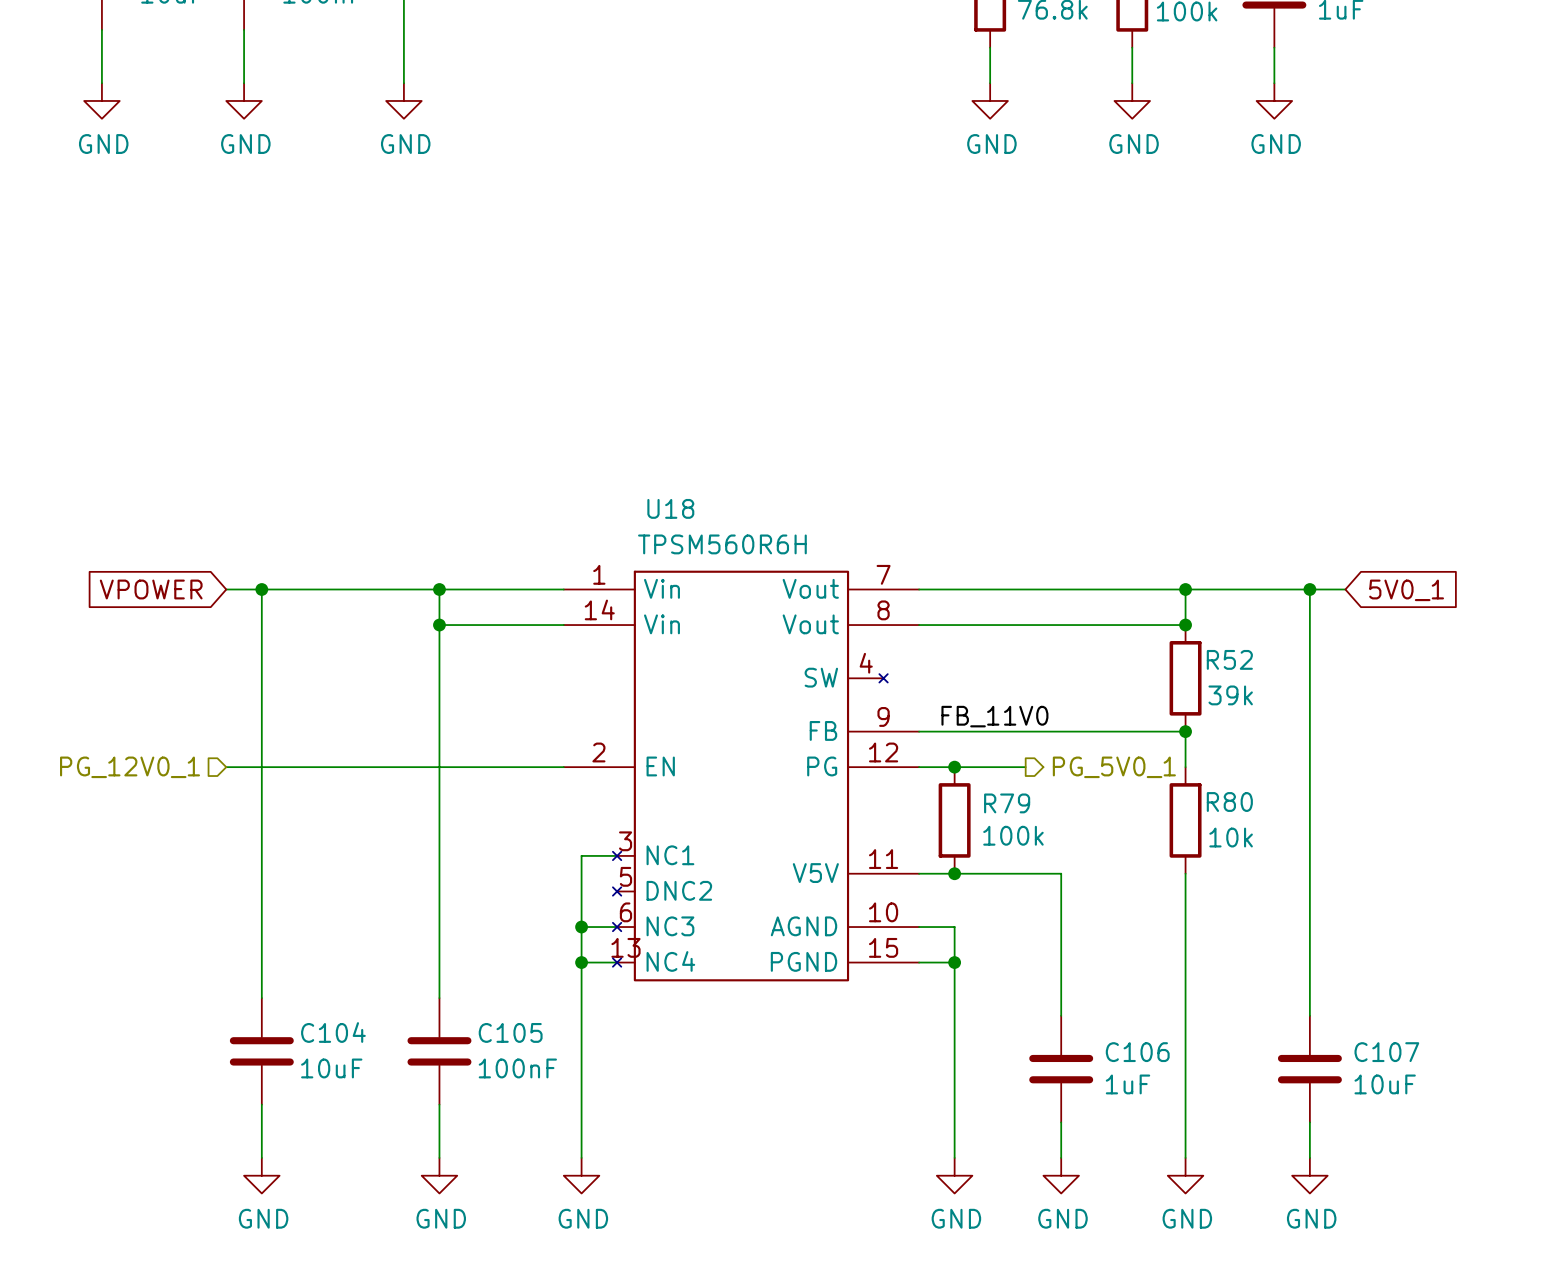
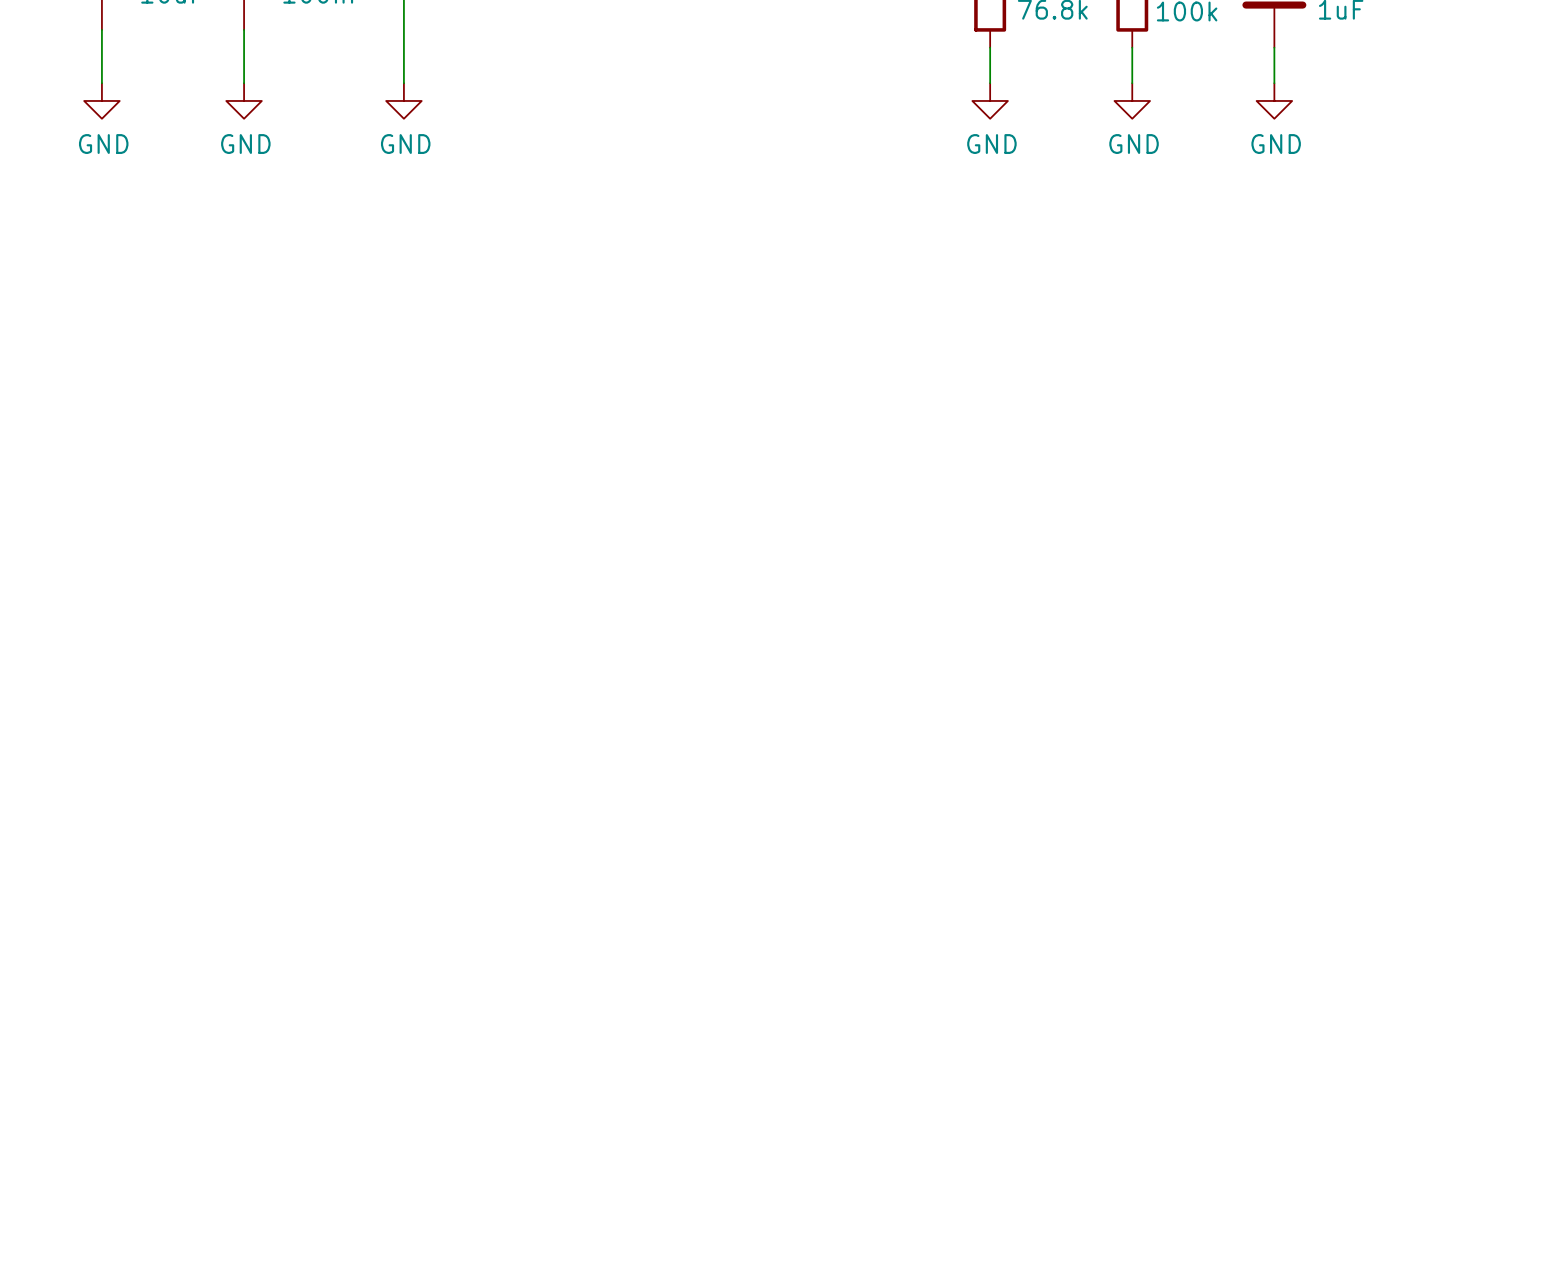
global label: VPOWER (151, 589) -> none
wire: (226, 589) (563, 589) -> none
wire: (261, 589) (261, 998) -> none
junction: (261, 589) -> none
wire: (439, 589) (439, 998) -> none
junction: (439, 589) -> none
wire: (919, 589) (1345, 589) -> none
wire: (1185, 589) (1185, 625) (919, 625) -> none
junction: (1185, 589) -> none
wire: (1309, 589) (1309, 1015) -> none
junction: (1309, 589) -> none
global label: 5V0_1 (1406, 590) -> none
wire: (439, 625) (563, 625) -> none
junction: (439, 625) -> none
junction: (1185, 625) -> none
R52: 39k (1185, 678) -> none
label: FB_11V0 (994, 716) -> none
wire: (919, 731) (1185, 731) (1185, 767) -> none
junction: (1185, 731) -> none
hierarchical label: PG_12V0_1 (130, 767) -> none
wire: (226, 767) (563, 767) -> none
wire: (919, 767) (1025, 767) -> none
junction: (954, 767) -> none
hierarchical label: PG_5V0_1 (1114, 767) -> none
U18: TPSM560R6H (768, 776) -> none
R79: 100k (954, 820) -> none
R80: 10k (1185, 820) -> none
wire: (617, 855) (581, 855) (581, 1157) -> none
wire: (919, 873) (1061, 873) (1061, 1015) -> none
junction: (954, 873) -> none
wire: (1185, 873) (1185, 1157) -> none
wire: (581, 927) (617, 927) -> none
junction: (581, 927) -> none
wire: (919, 927) (954, 927) (954, 1157) -> none
wire: (581, 962) (617, 962) -> none
junction: (581, 962) -> none
wire: (919, 962) (954, 962) -> none
junction: (954, 962) -> none
C104: 10uF (261, 1051) -> none
C105: 100nF (439, 1051) -> none
C106: 1uF (1061, 1069) -> none
C107: 10uF (1309, 1069) -> none
wire: (261, 1104) (261, 1157) -> none
wire: (439, 1104) (439, 1157) -> none
wire: (1061, 1122) (1061, 1157) -> none
wire: (1309, 1122) (1309, 1157) -> none
power symbol: GND (261, 1175) -> none
power symbol: GND (439, 1175) -> none
power symbol: GND (581, 1175) -> none
power symbol: GND (954, 1175) -> none
power symbol: GND (1061, 1175) -> none
power symbol: GND (1185, 1175) -> none
power symbol: GND (1309, 1175) -> none

